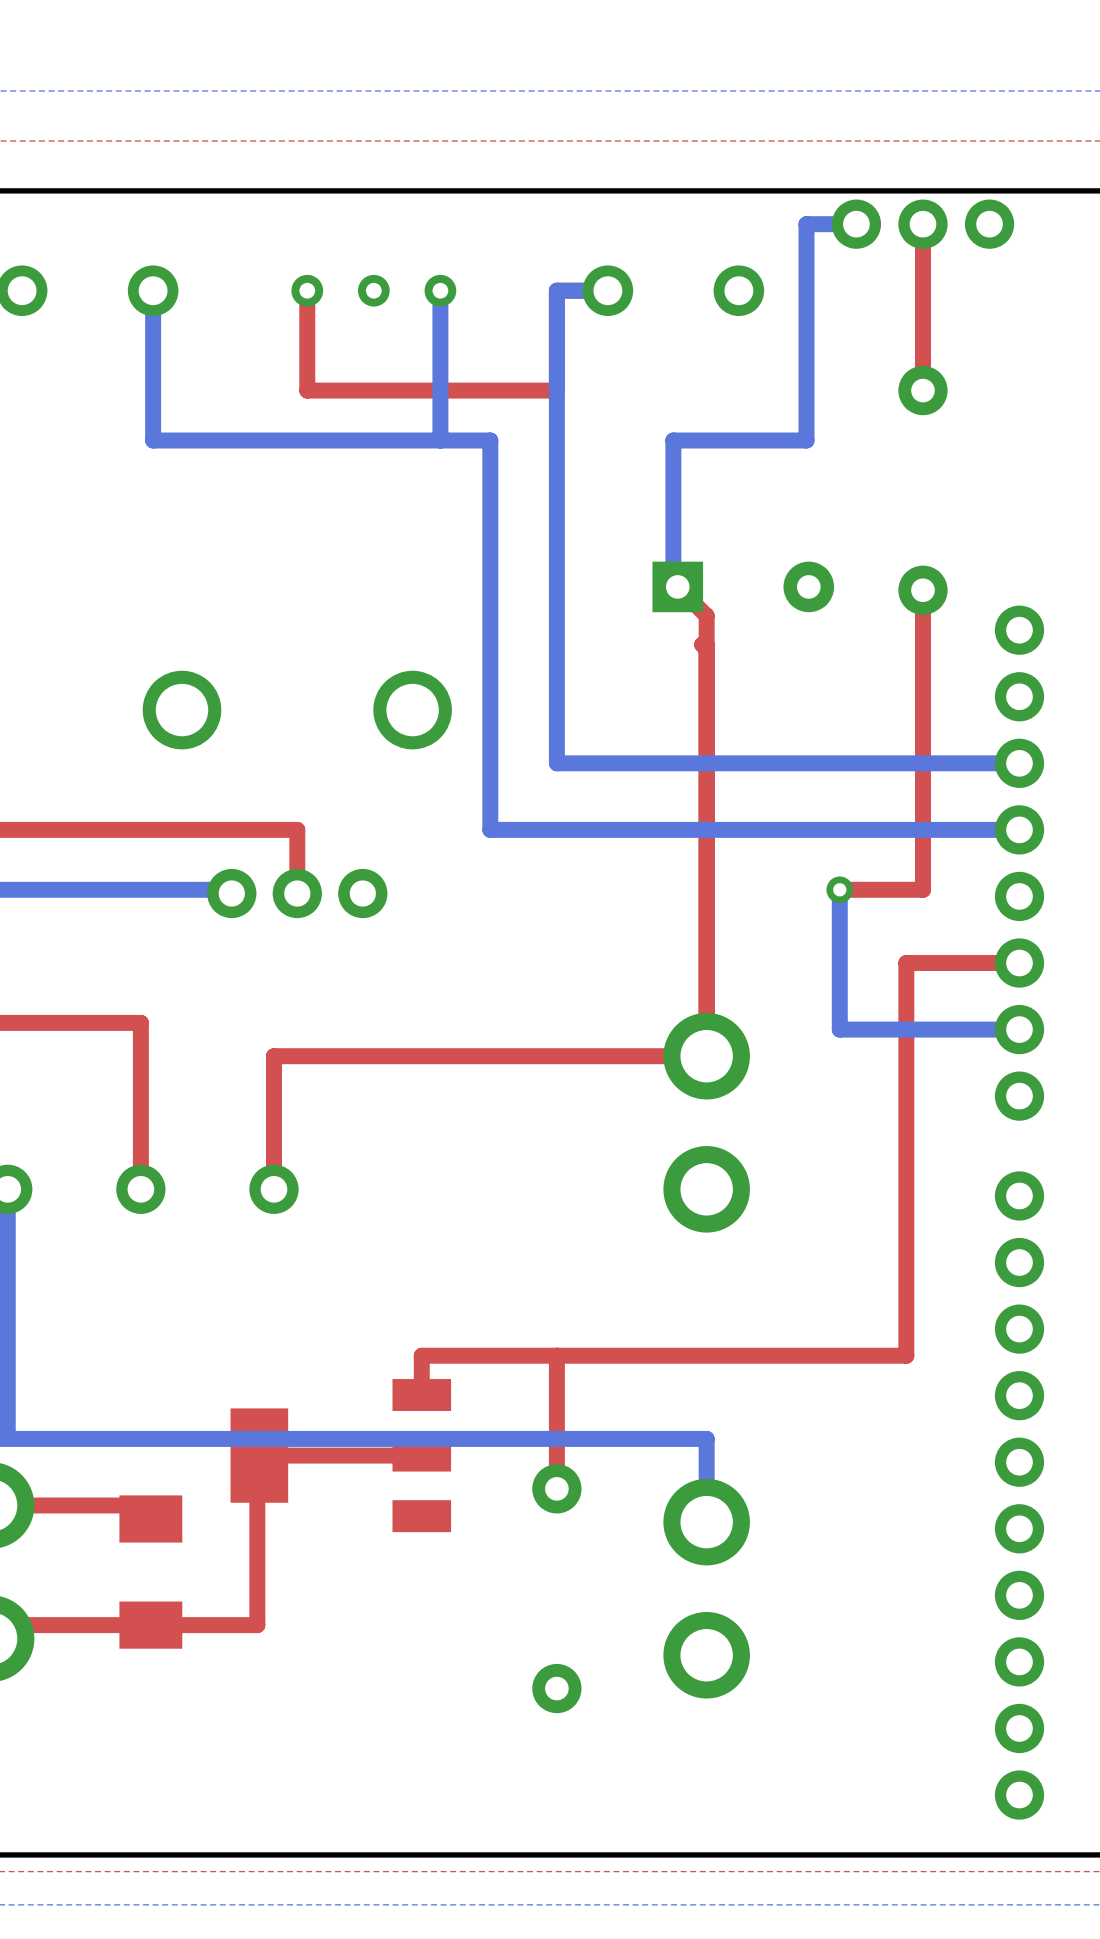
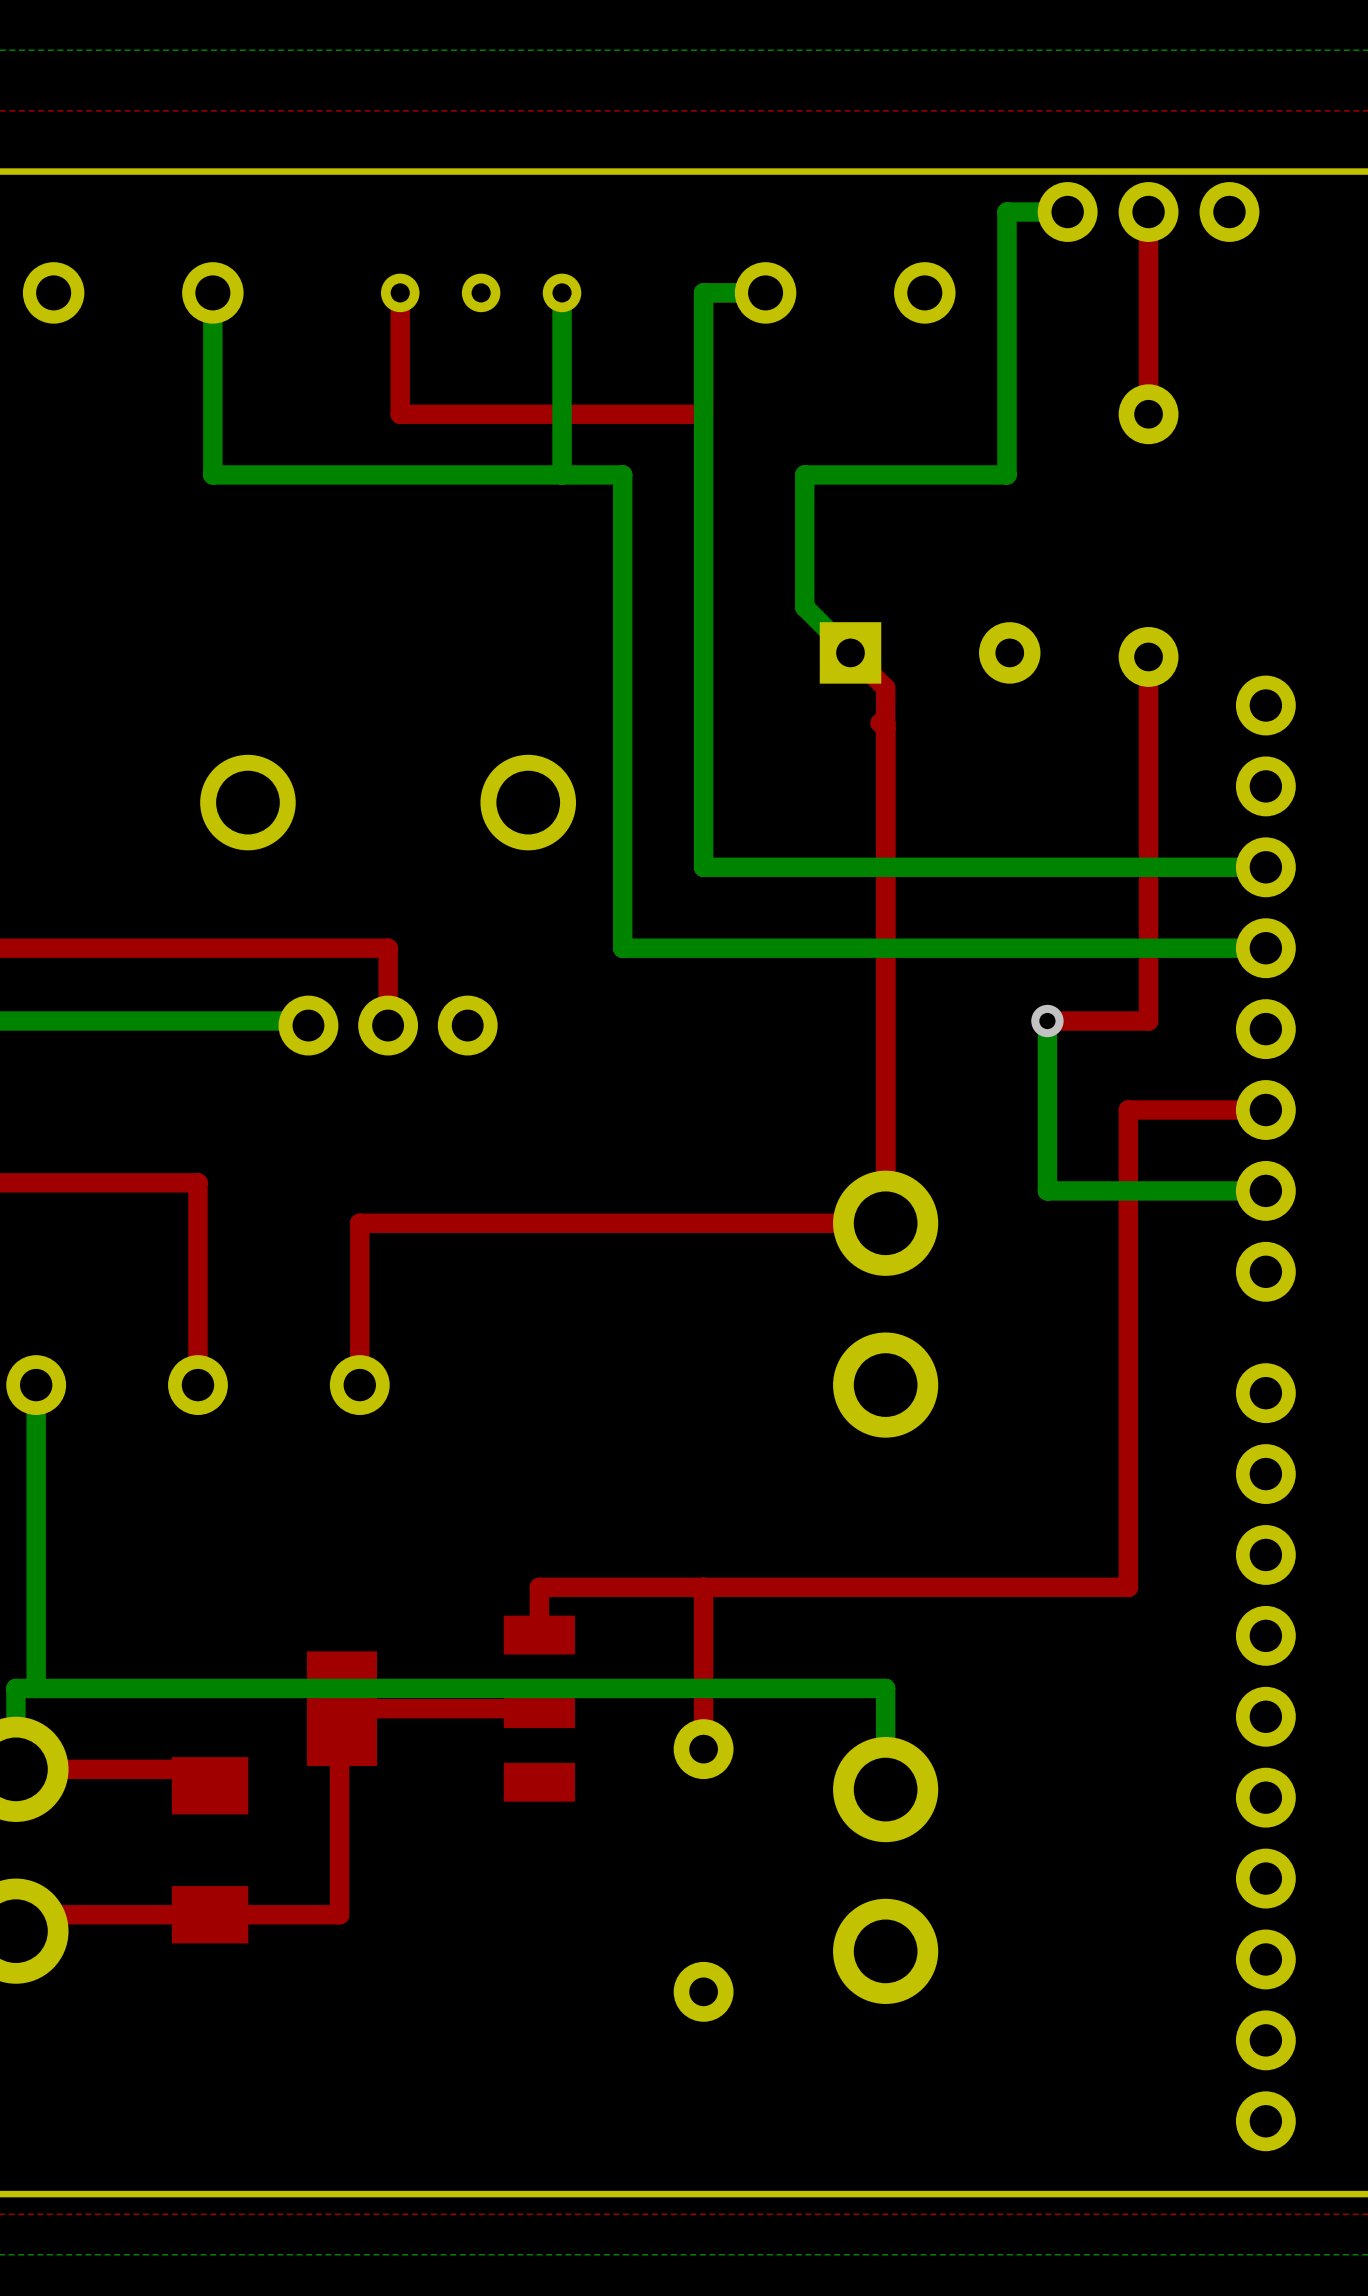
bottom track: (673, 440) (673, 582) -> (845, 474) (804, 474) (804, 607) (845, 647)

